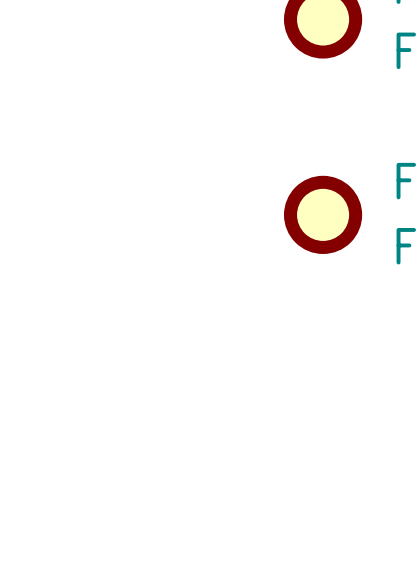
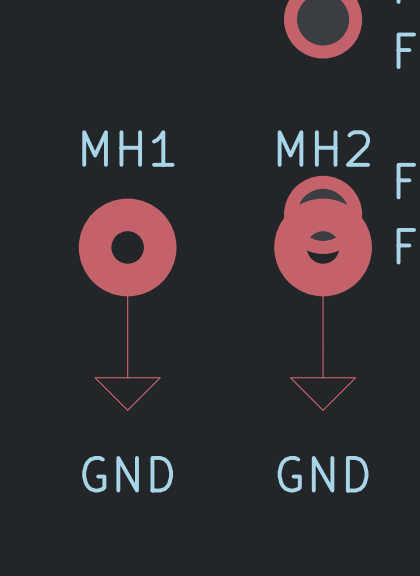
MH1: none -> (127, 271)
MH2: none -> (323, 271)
power symbol: none -> GND (127, 377)
power symbol: none -> GND (323, 377)

